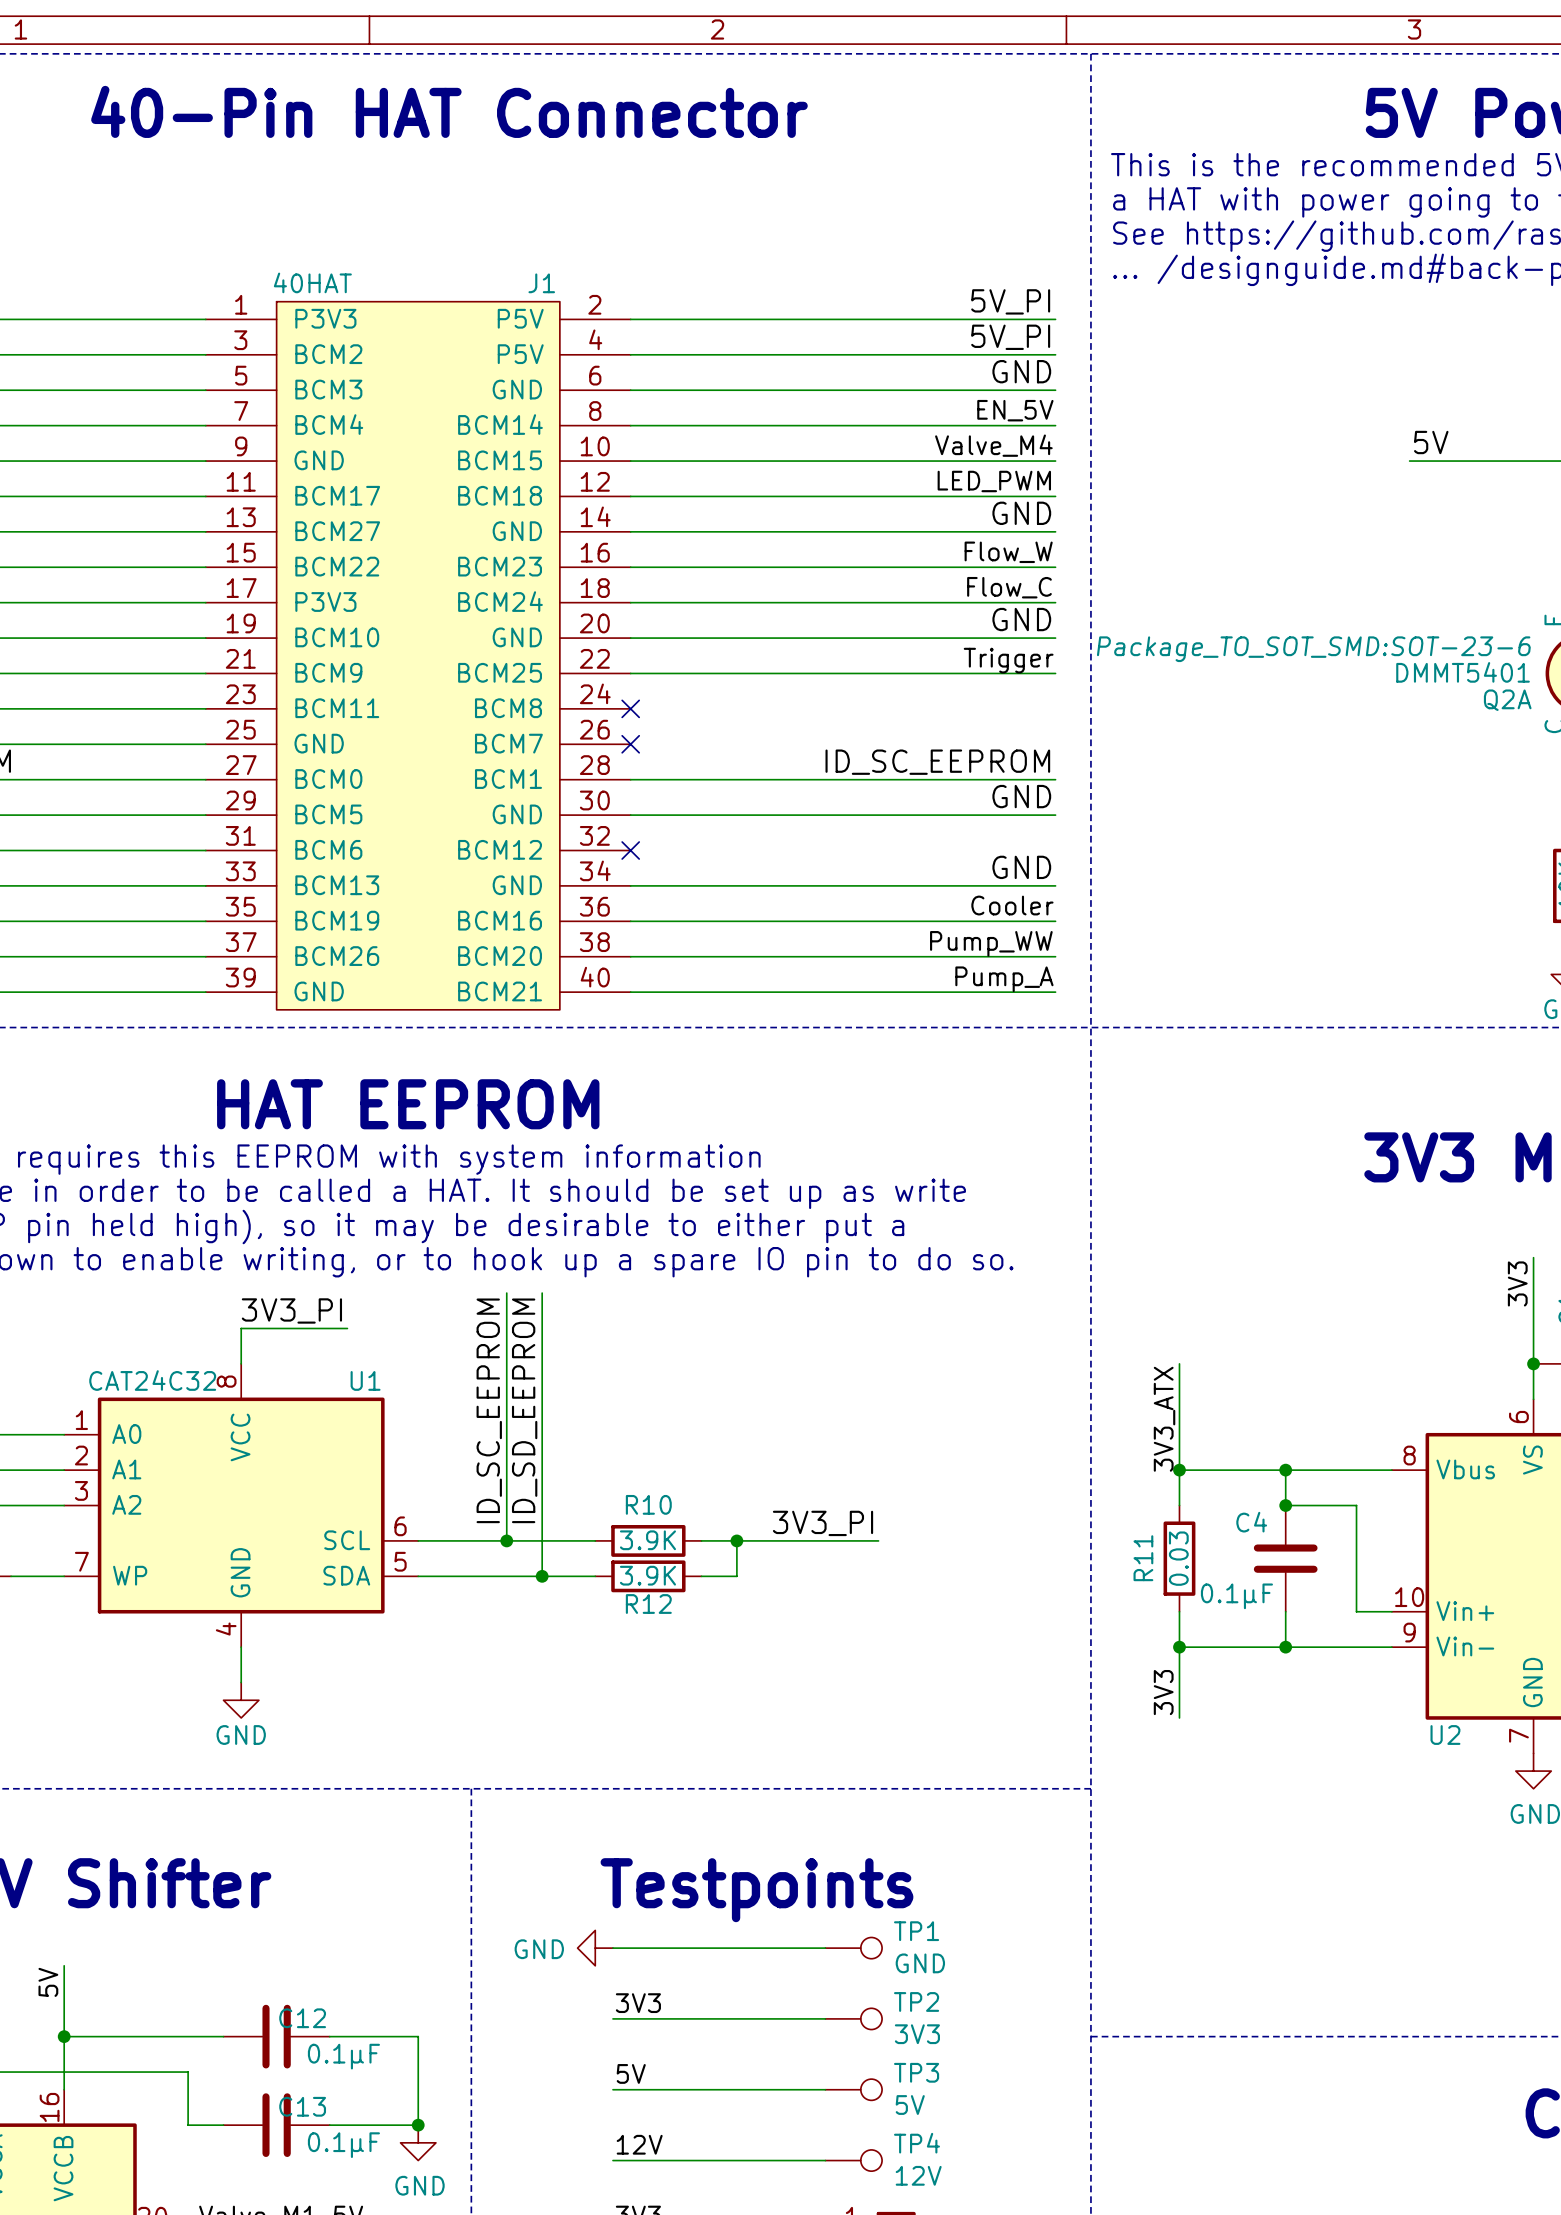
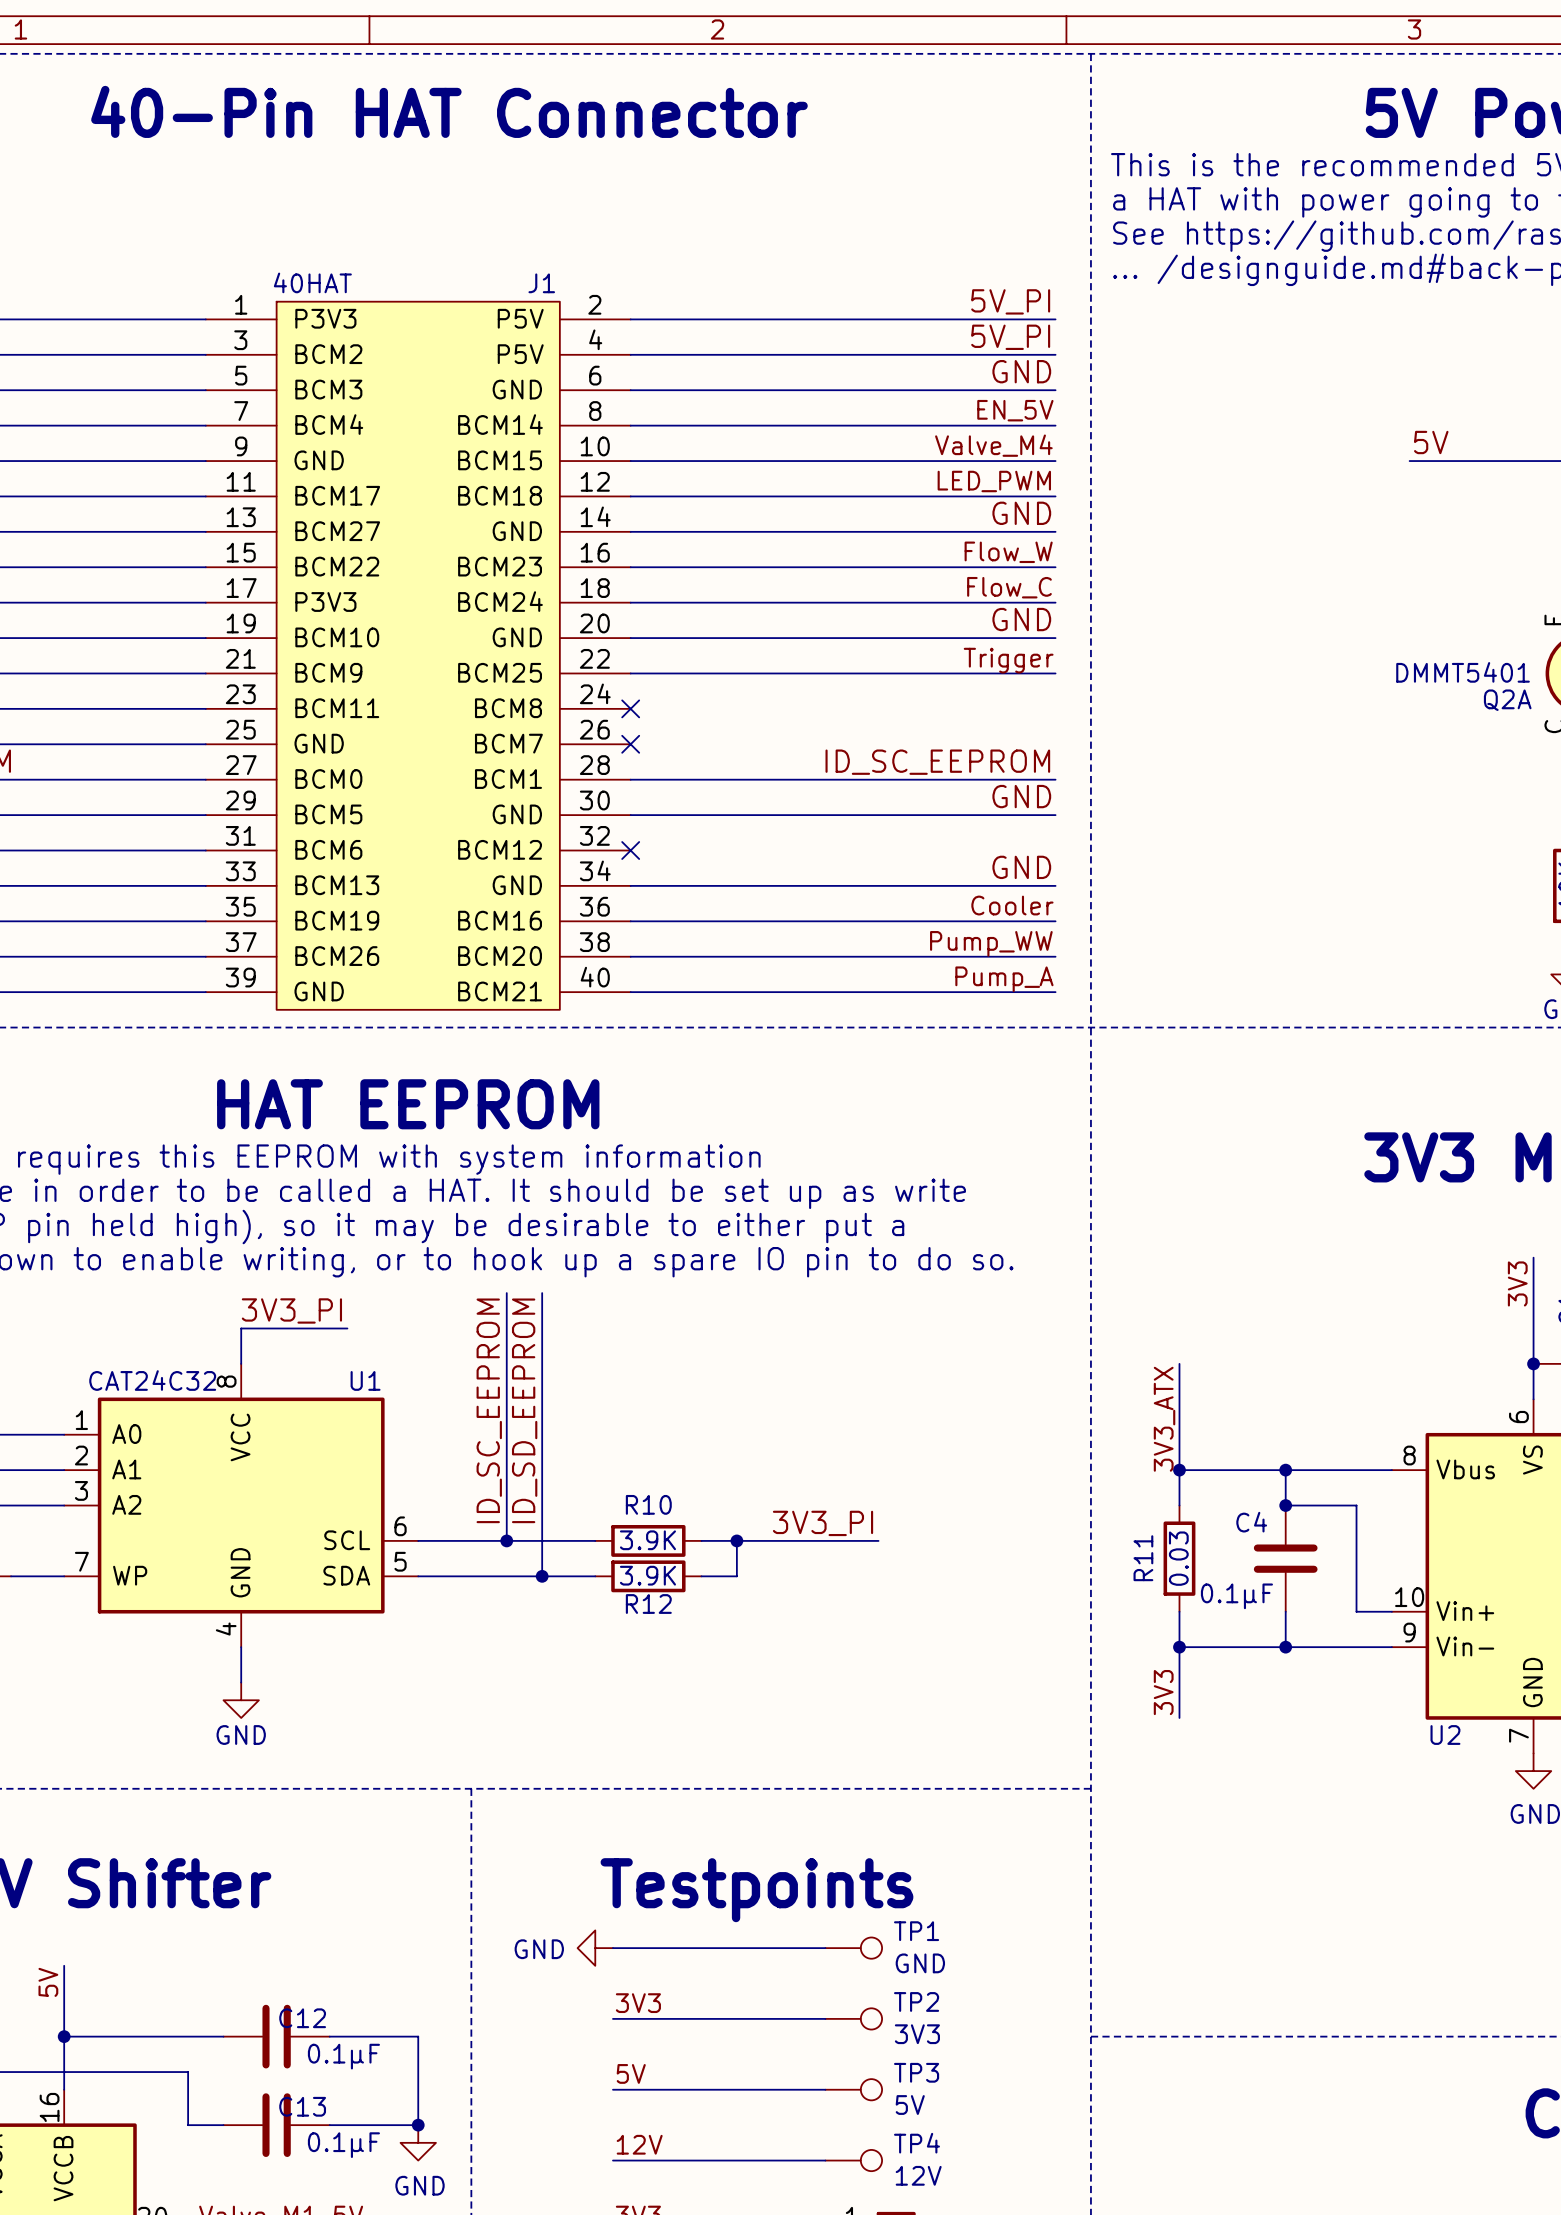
Q2A text: Package_TO_SOT_SMD:SOT-23-6 (1313, 649) -> none

